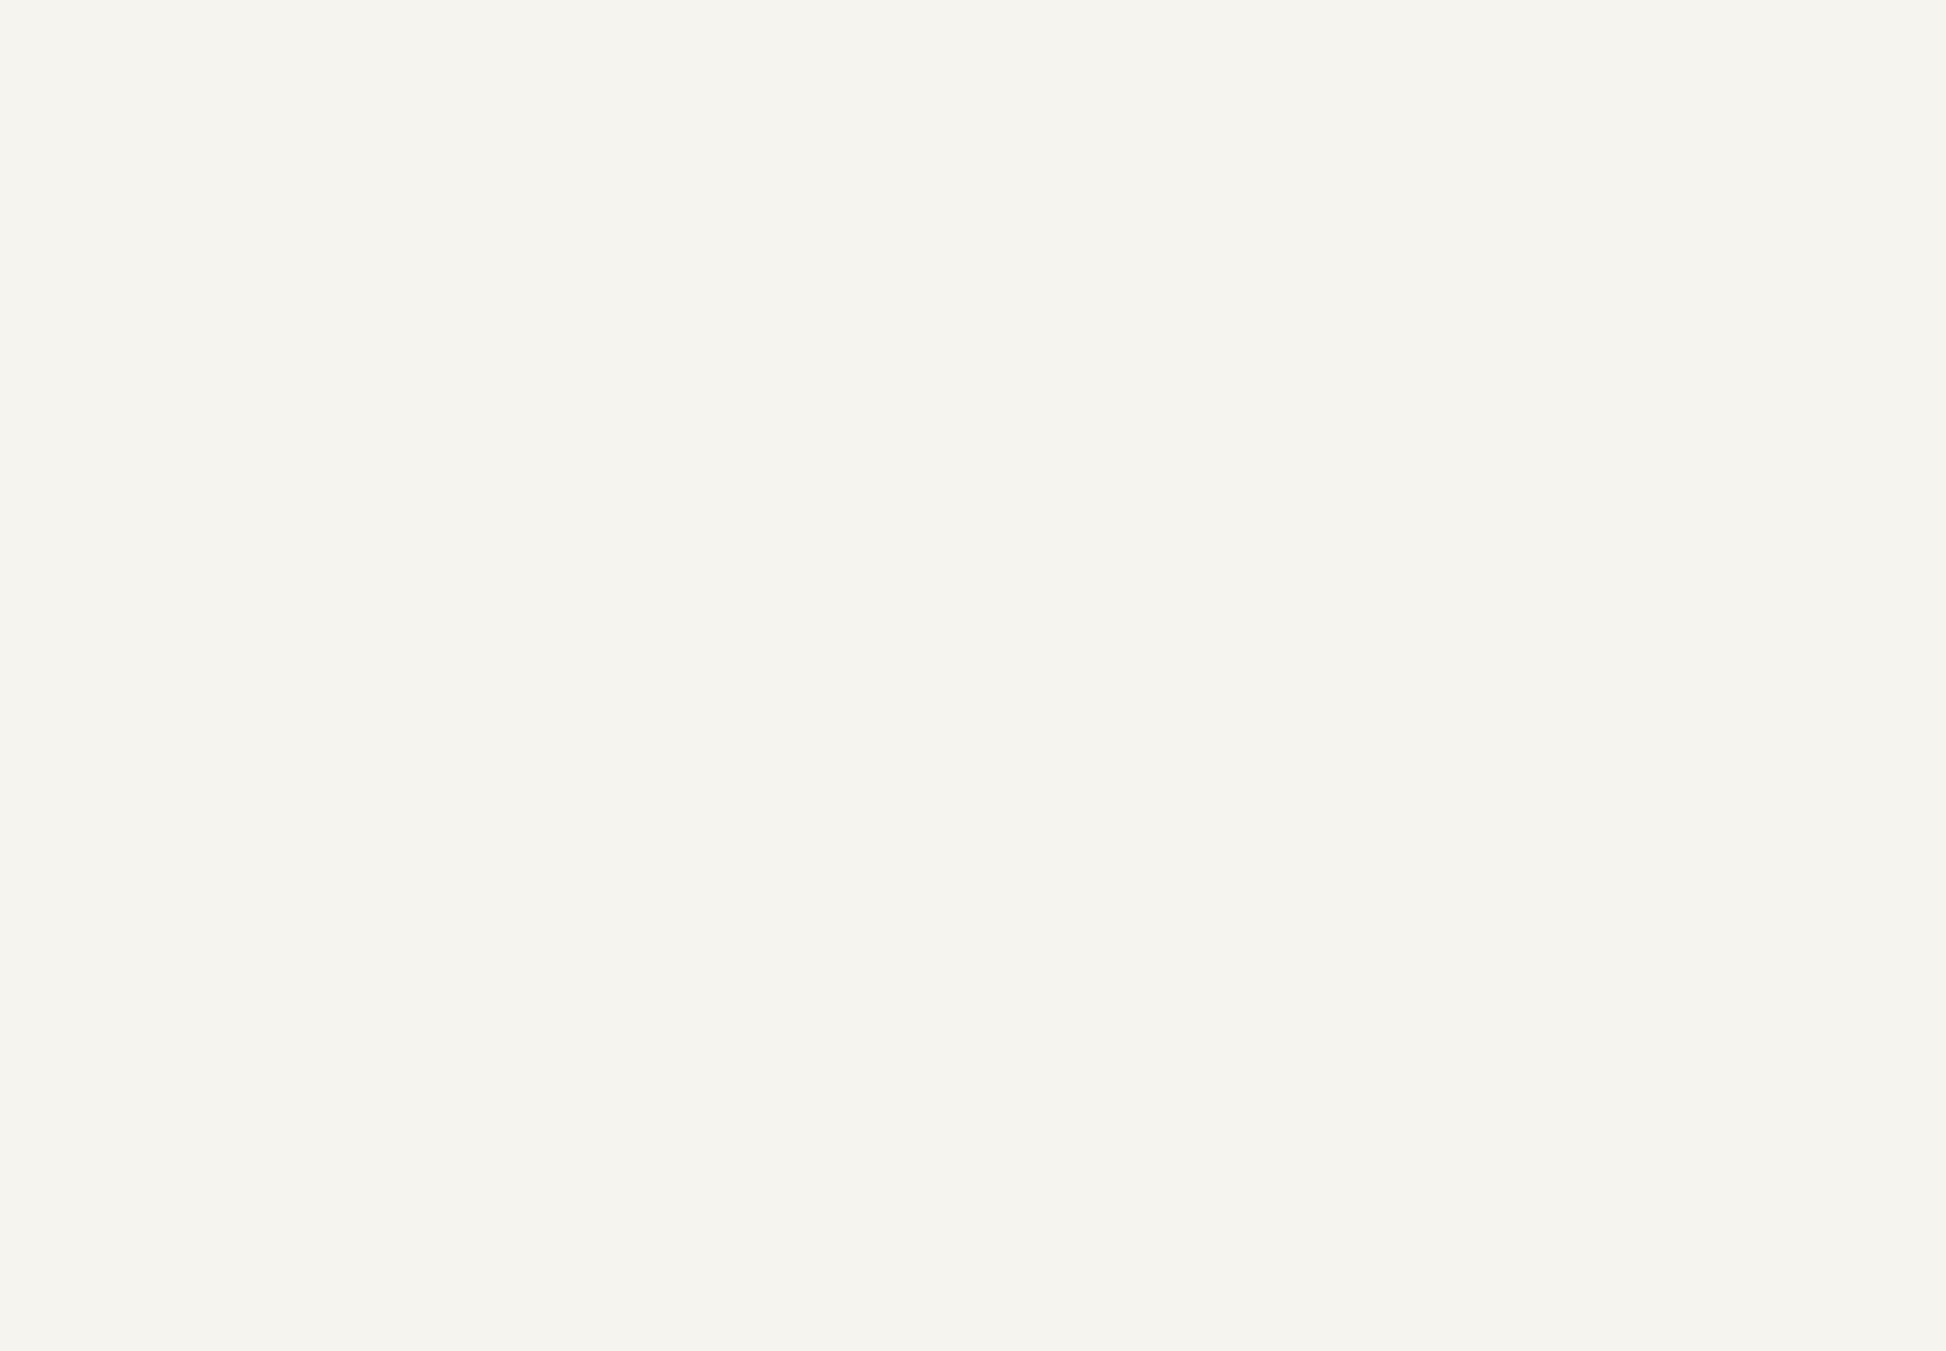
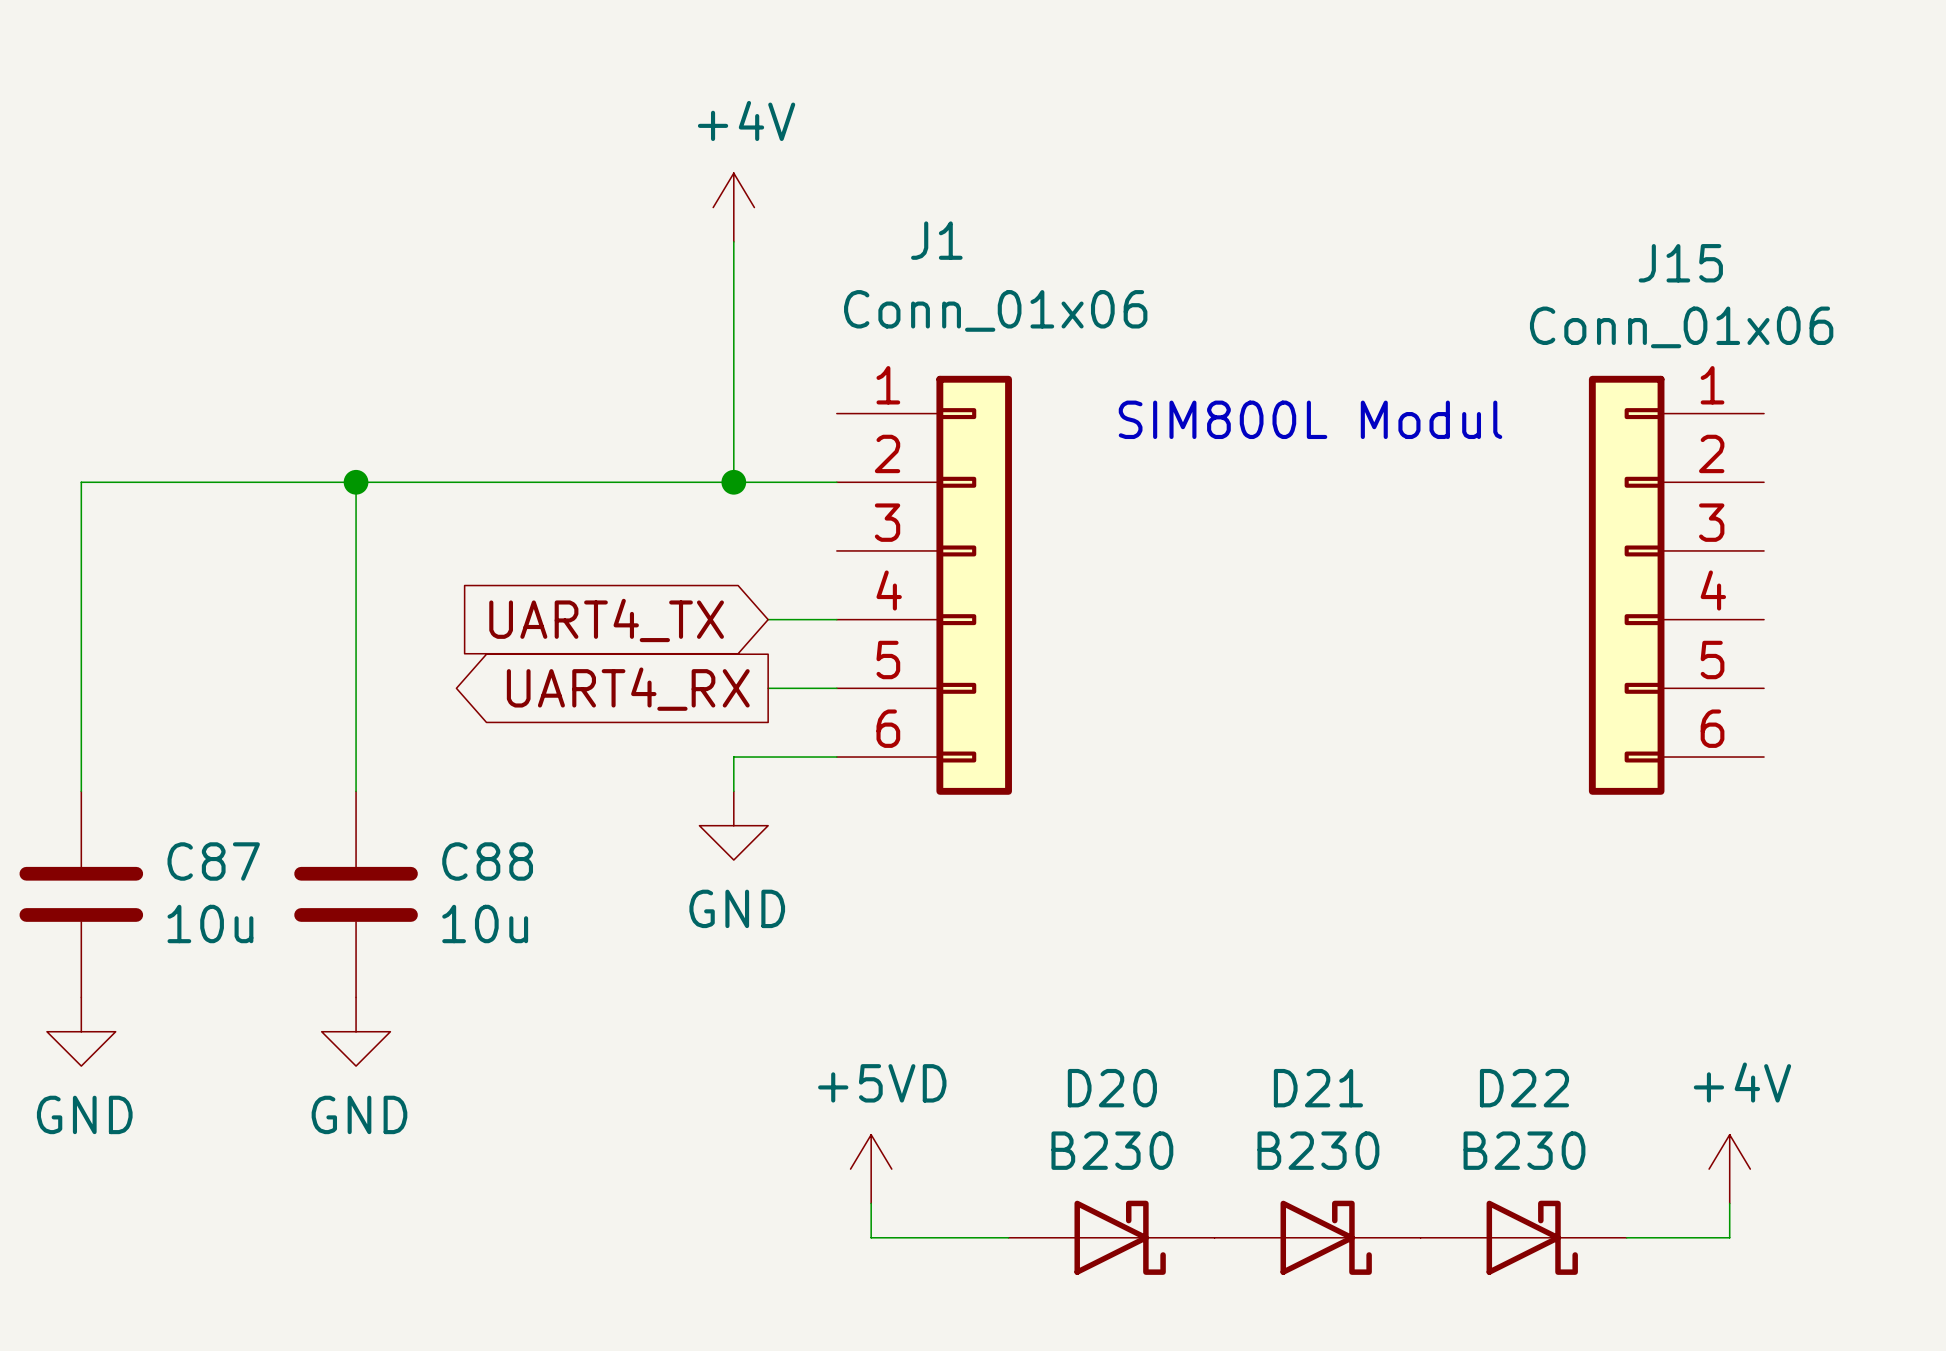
power symbol: none -> +4V (733, 207)
wire: none -> (733, 241) (733, 482)
text: none -> SIM800L Modul (1310, 419)
wire: none -> (356, 482) (356, 791)
junction: none -> (356, 482)
junction: none -> (733, 482)
wire: none -> (836, 482) (81, 482) (81, 791)
J1: none -> Conn_01x06 (924, 585)
J15: none -> Conn_01x06 (1676, 585)
wire: none -> (768, 619) (836, 619)
global label: none -> UART4_TX (606, 620)
wire: none -> (768, 688) (836, 688)
global label: none -> UART4_RX (628, 689)
wire: none -> (836, 757) (733, 757) (733, 791)
power symbol: none -> GND (733, 825)
C87: none -> 10u (81, 894)
C88: none -> 10u (356, 894)
power symbol: none -> GND (81, 1031)
power symbol: none -> GND (356, 1031)
power symbol: none -> +5VD (871, 1169)
power symbol: none -> +4V (1729, 1169)
wire: none -> (871, 1203) (871, 1237) (1008, 1237)
wire: none -> (1729, 1203) (1729, 1237) (1626, 1237)
D20: none -> B230 (1111, 1237)
D21: none -> B230 (1317, 1237)
D22: none -> B230 (1523, 1237)

